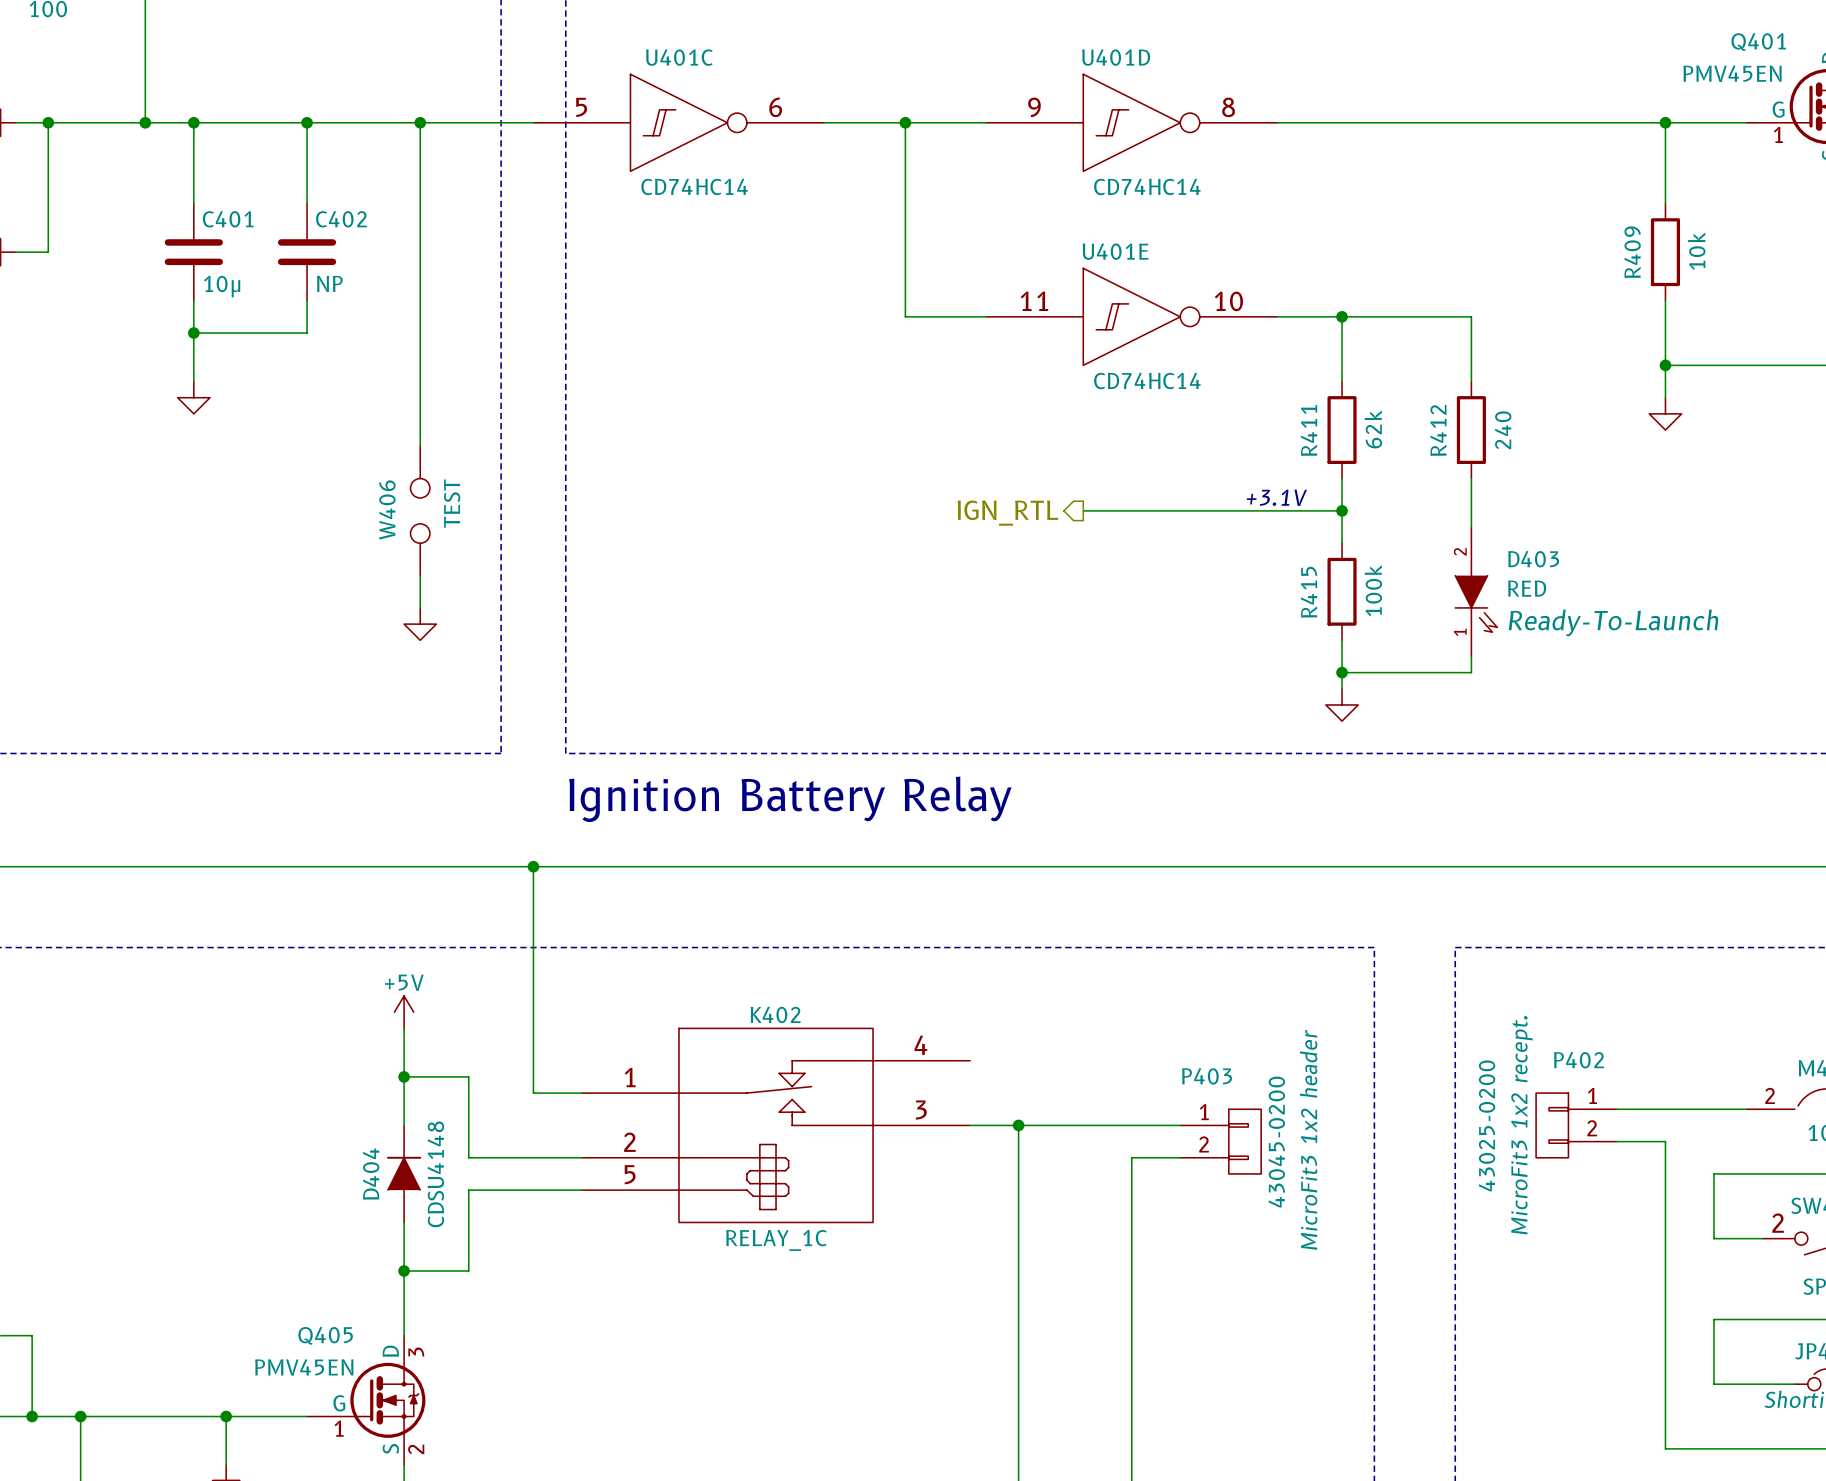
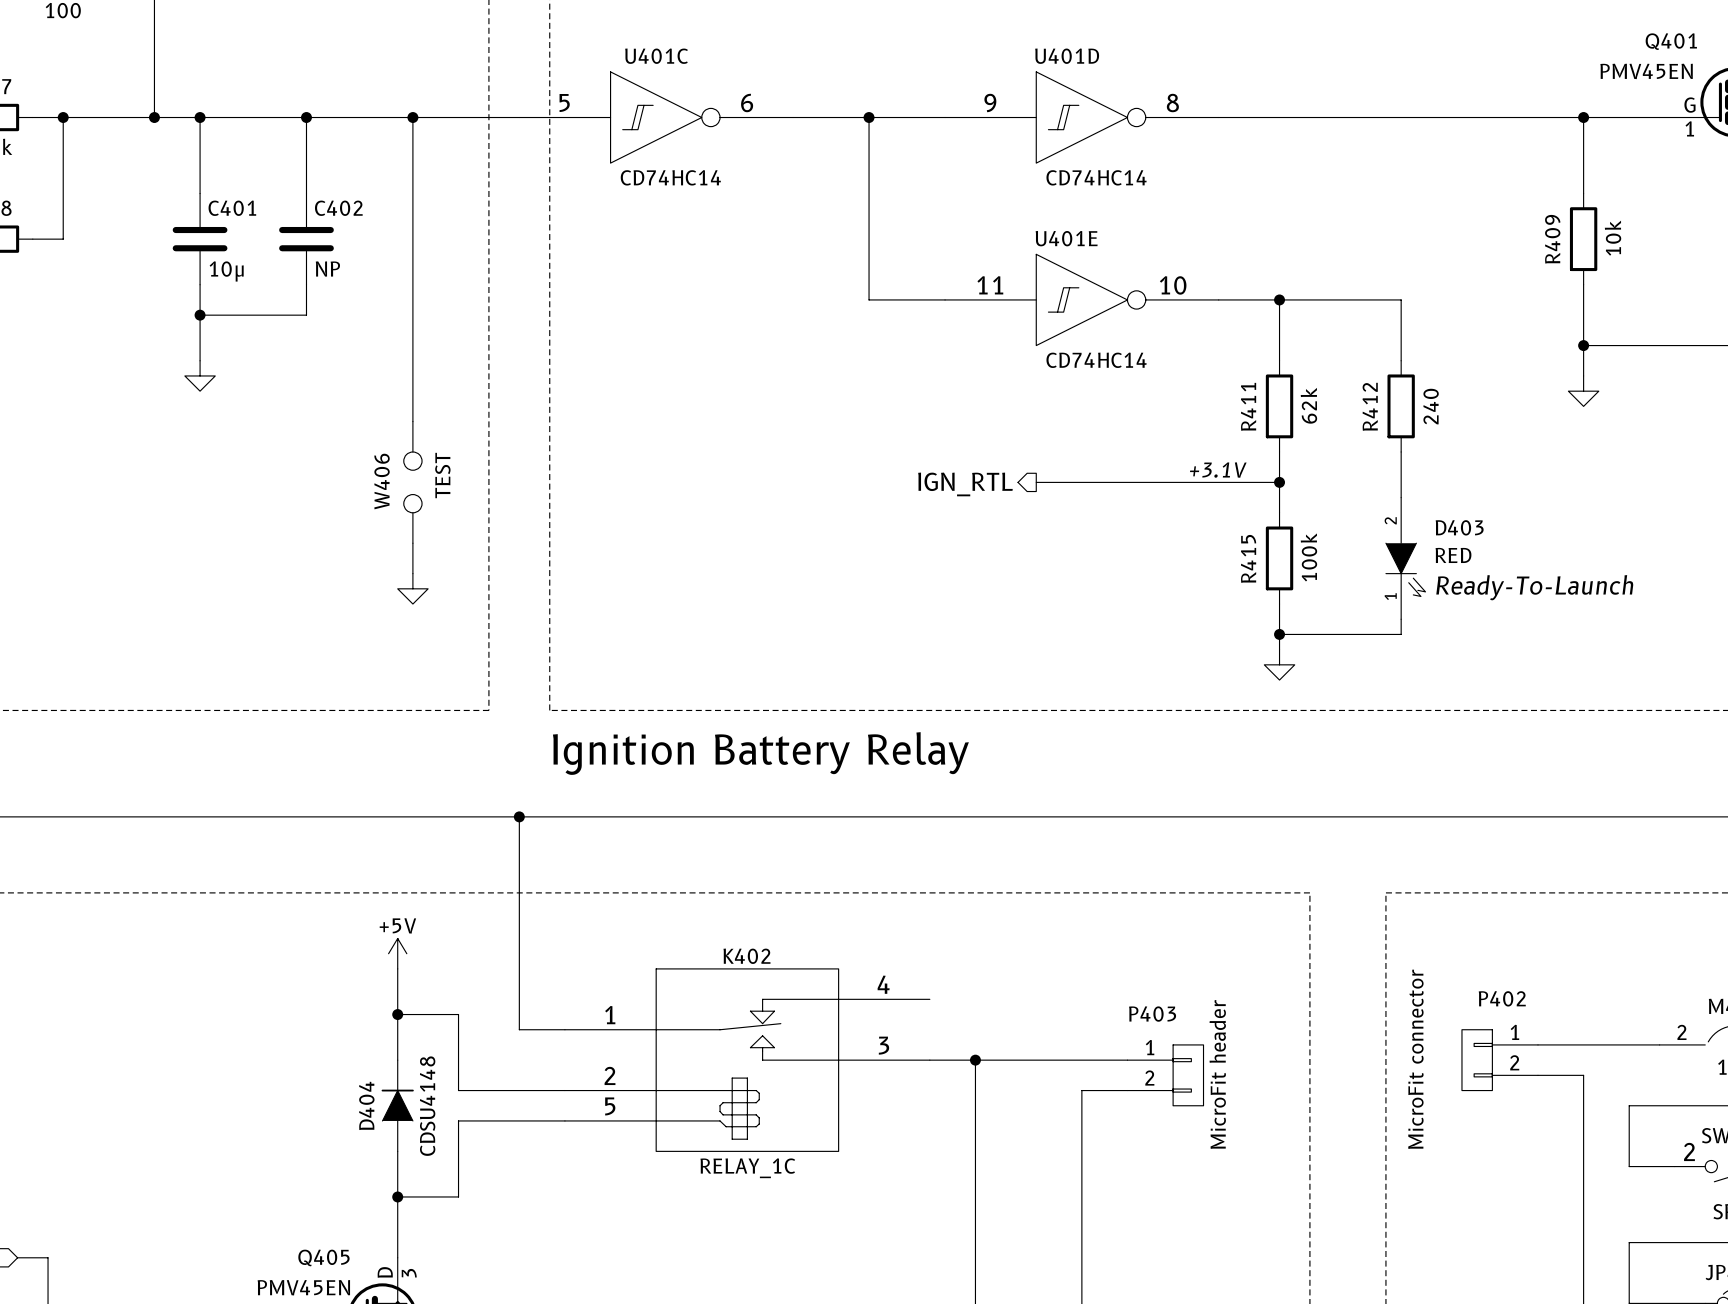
P402 value: 43025-0200 (1487, 1125) -> MicroFit connector (1415, 1059)
P402 text: MicroFit3 1x2 recept. (1521, 1125) -> none
P403 text: MicroFit3 1x2 header (1308, 1139) -> none
P403 value: 43045-0200 (1276, 1142) -> MicroFit header (1217, 1074)

